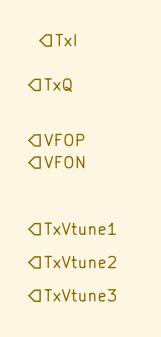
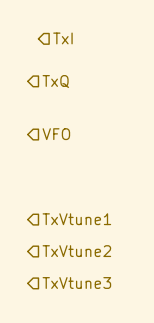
hierarchical label: VFOP (64, 139) -> VFO (56, 134)
hierarchical label: VFON (64, 162) -> none

